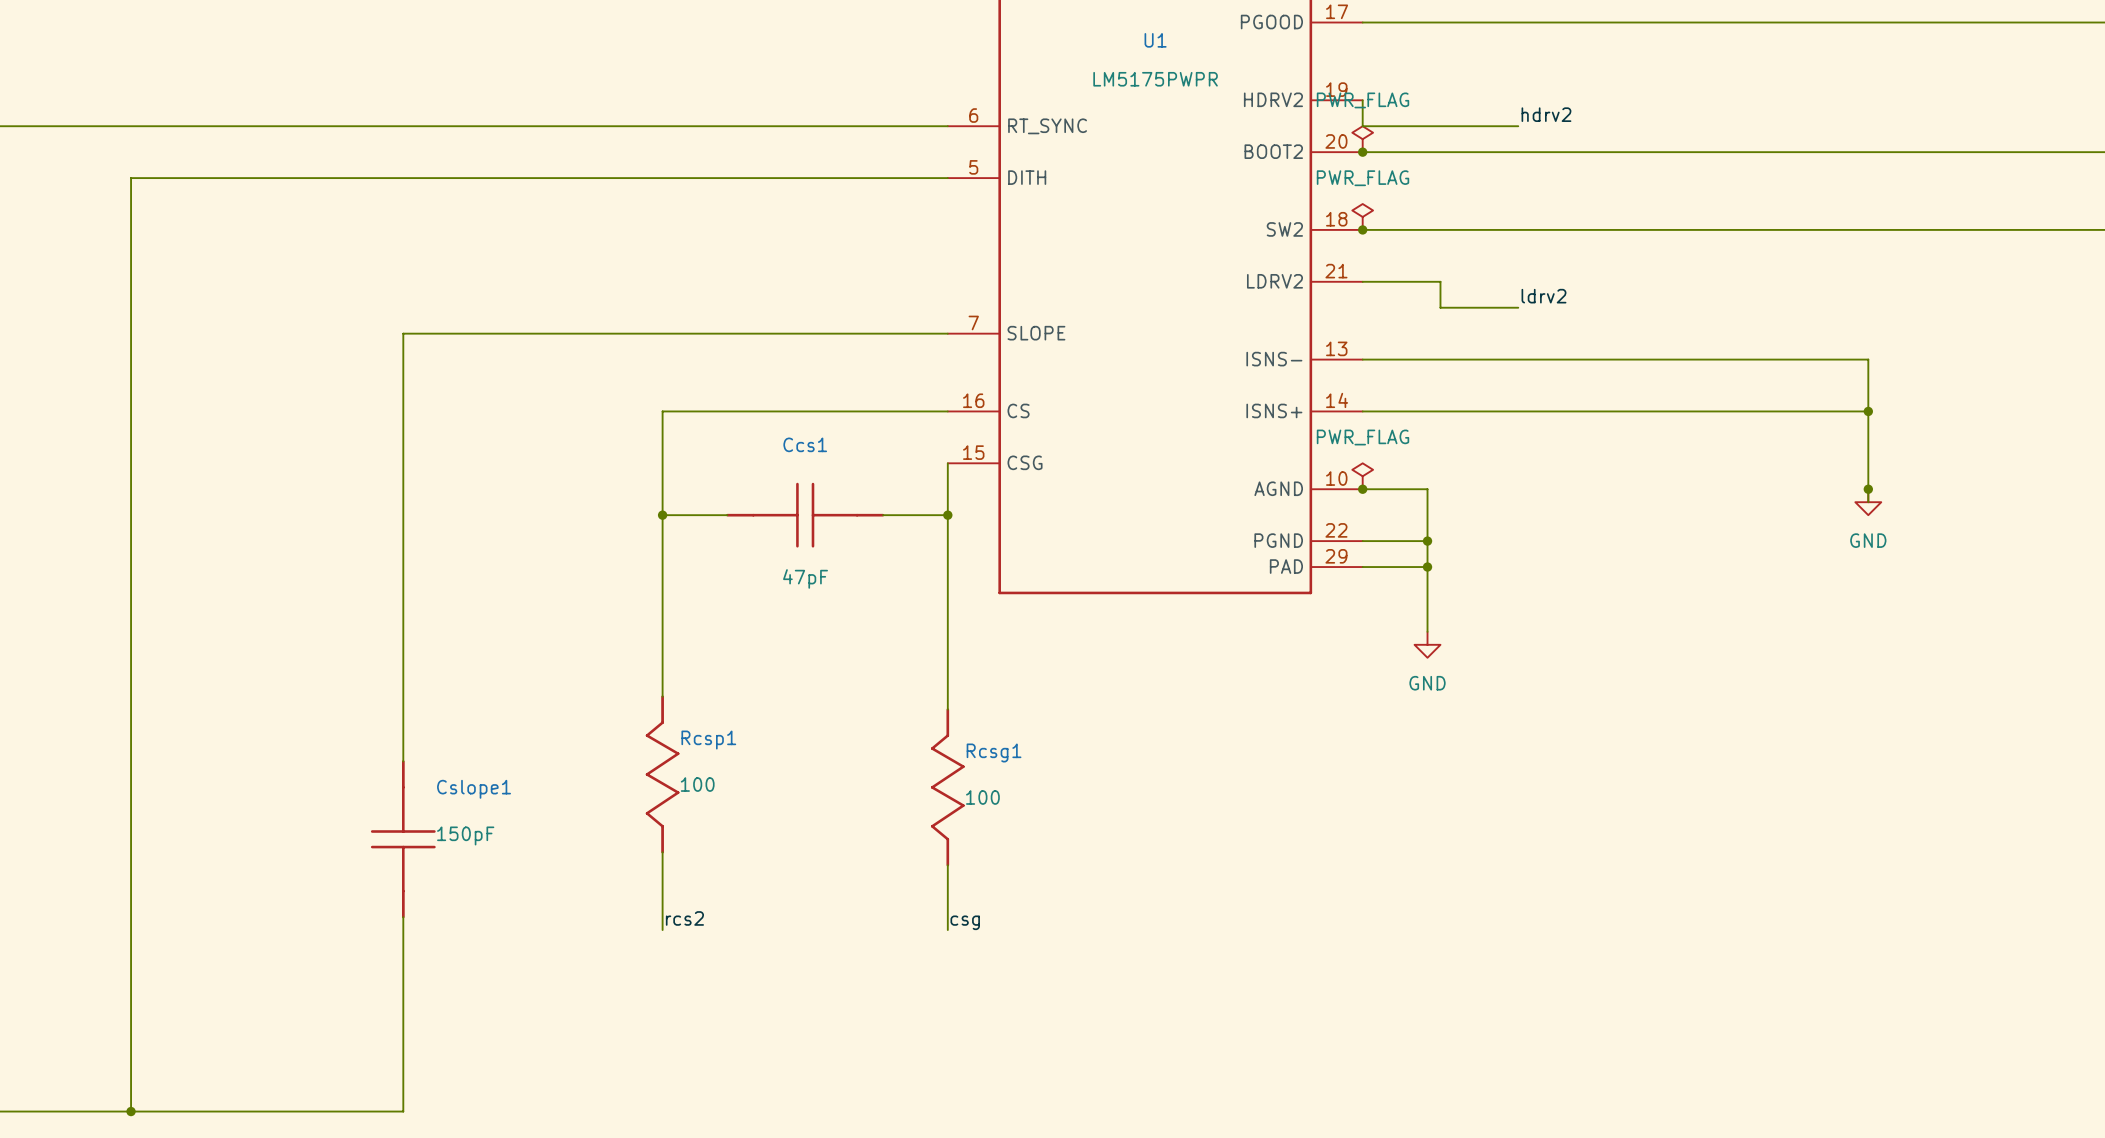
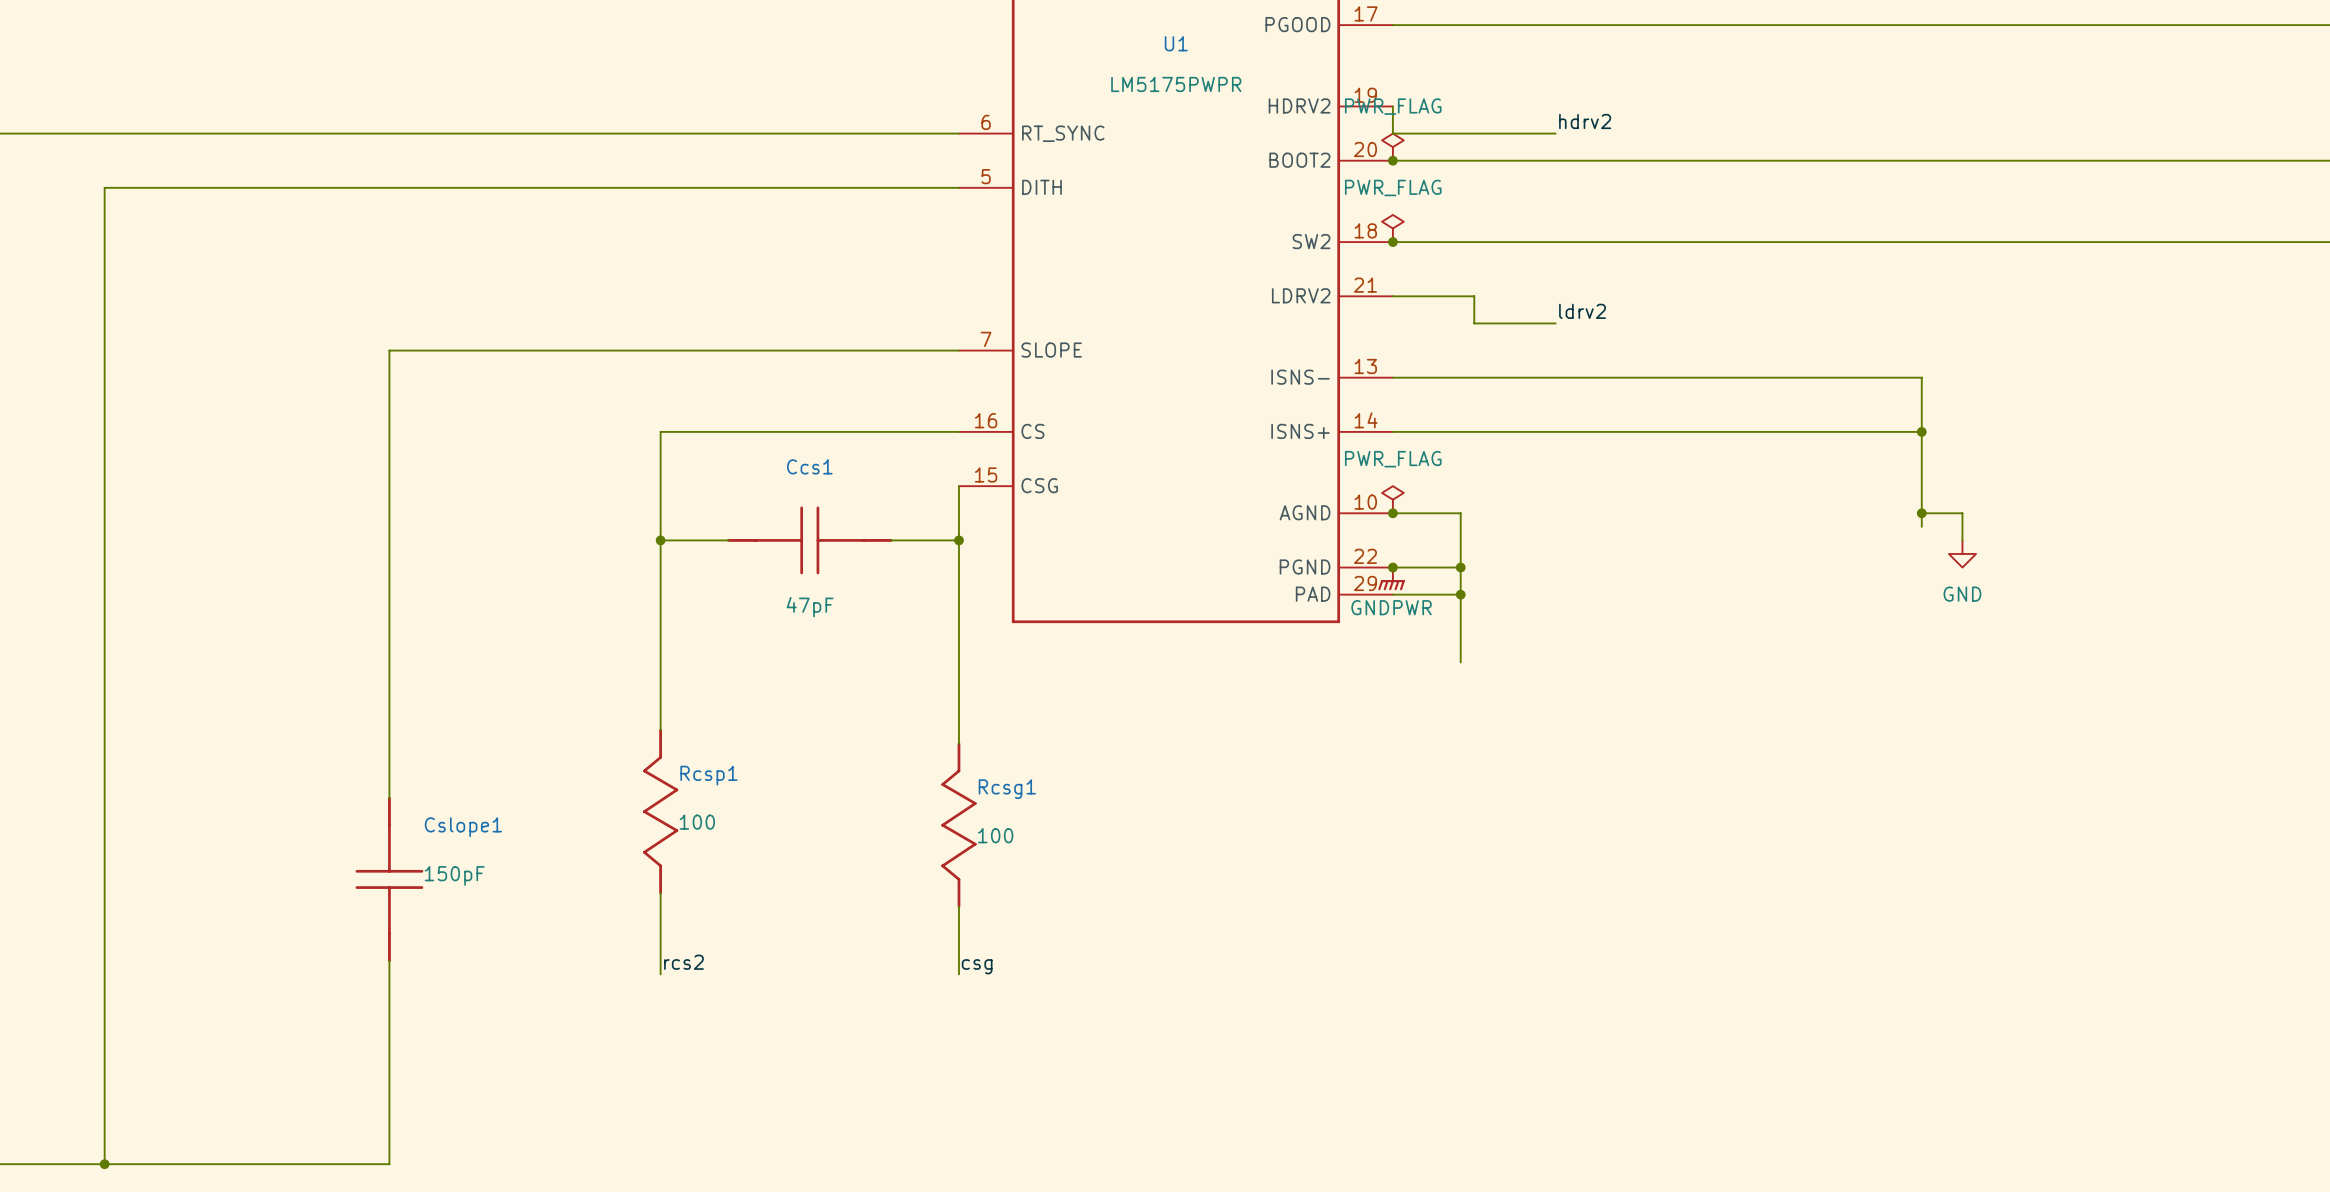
wire: none -> (1921, 513) (1962, 513) (1962, 540)
power symbol position: GND (1868, 502) -> GND (1962, 553)
junction: none -> (1392, 567)
power symbol: none -> GNDPWR (1391, 578)
power symbol: GND (1427, 644) -> none

